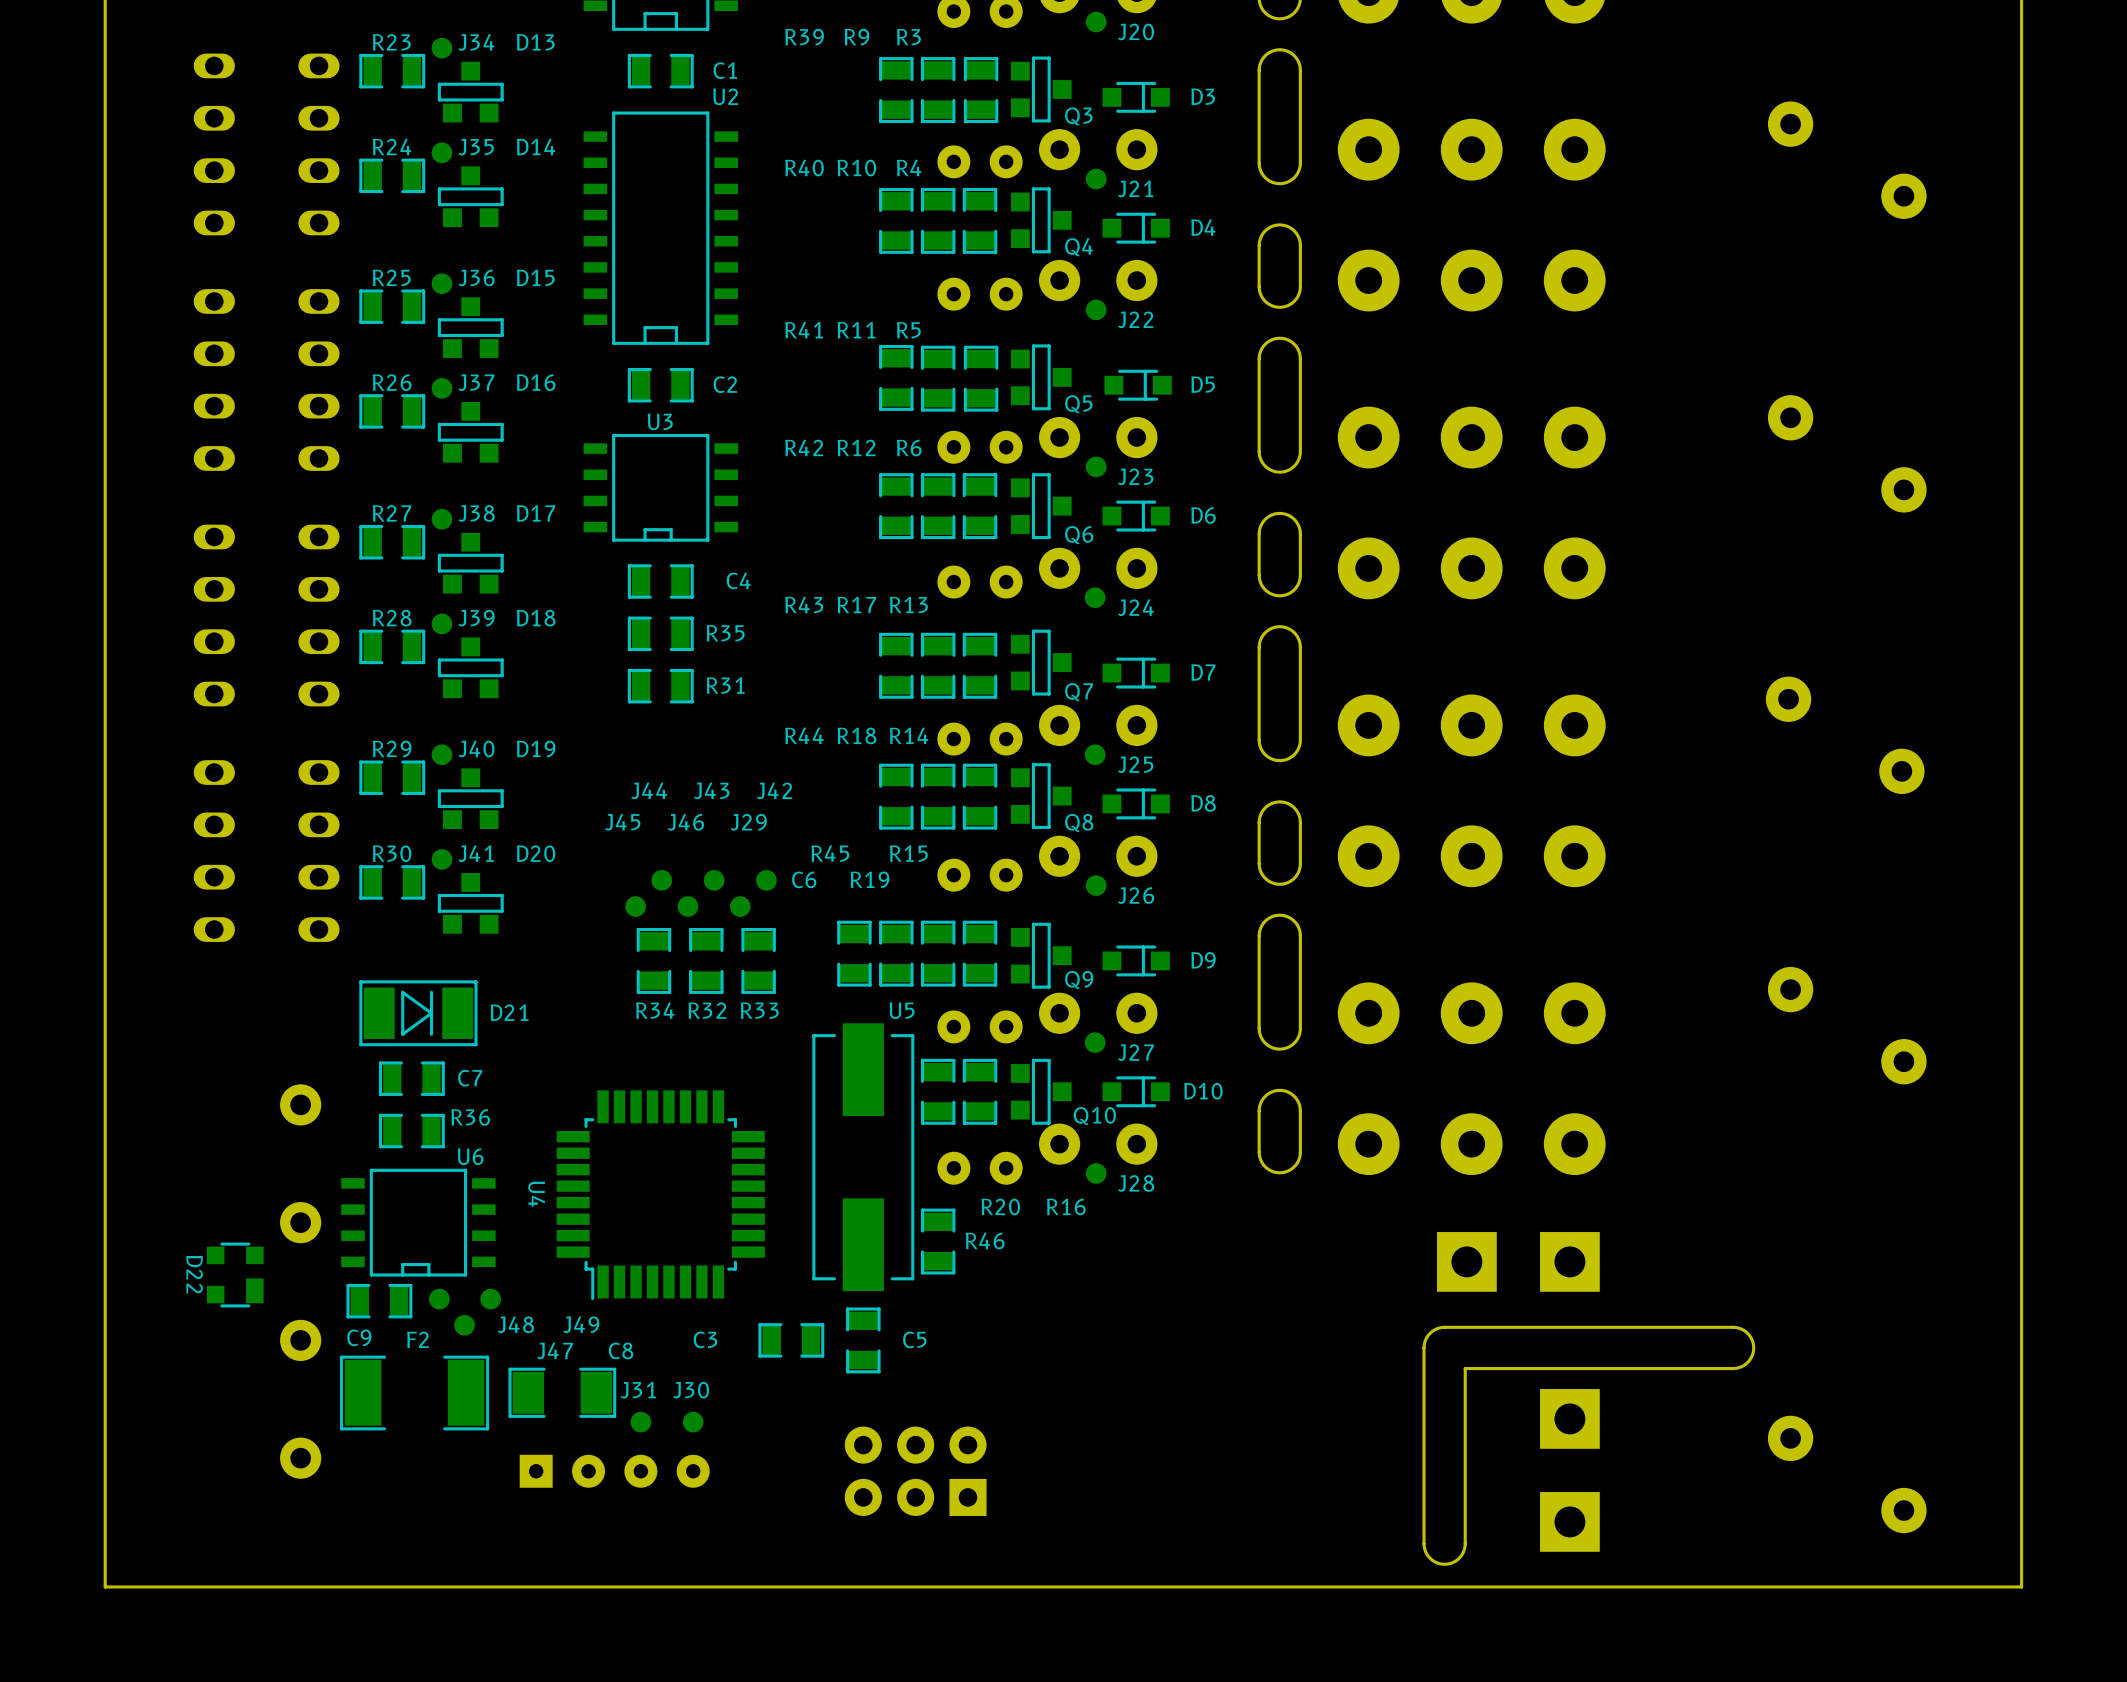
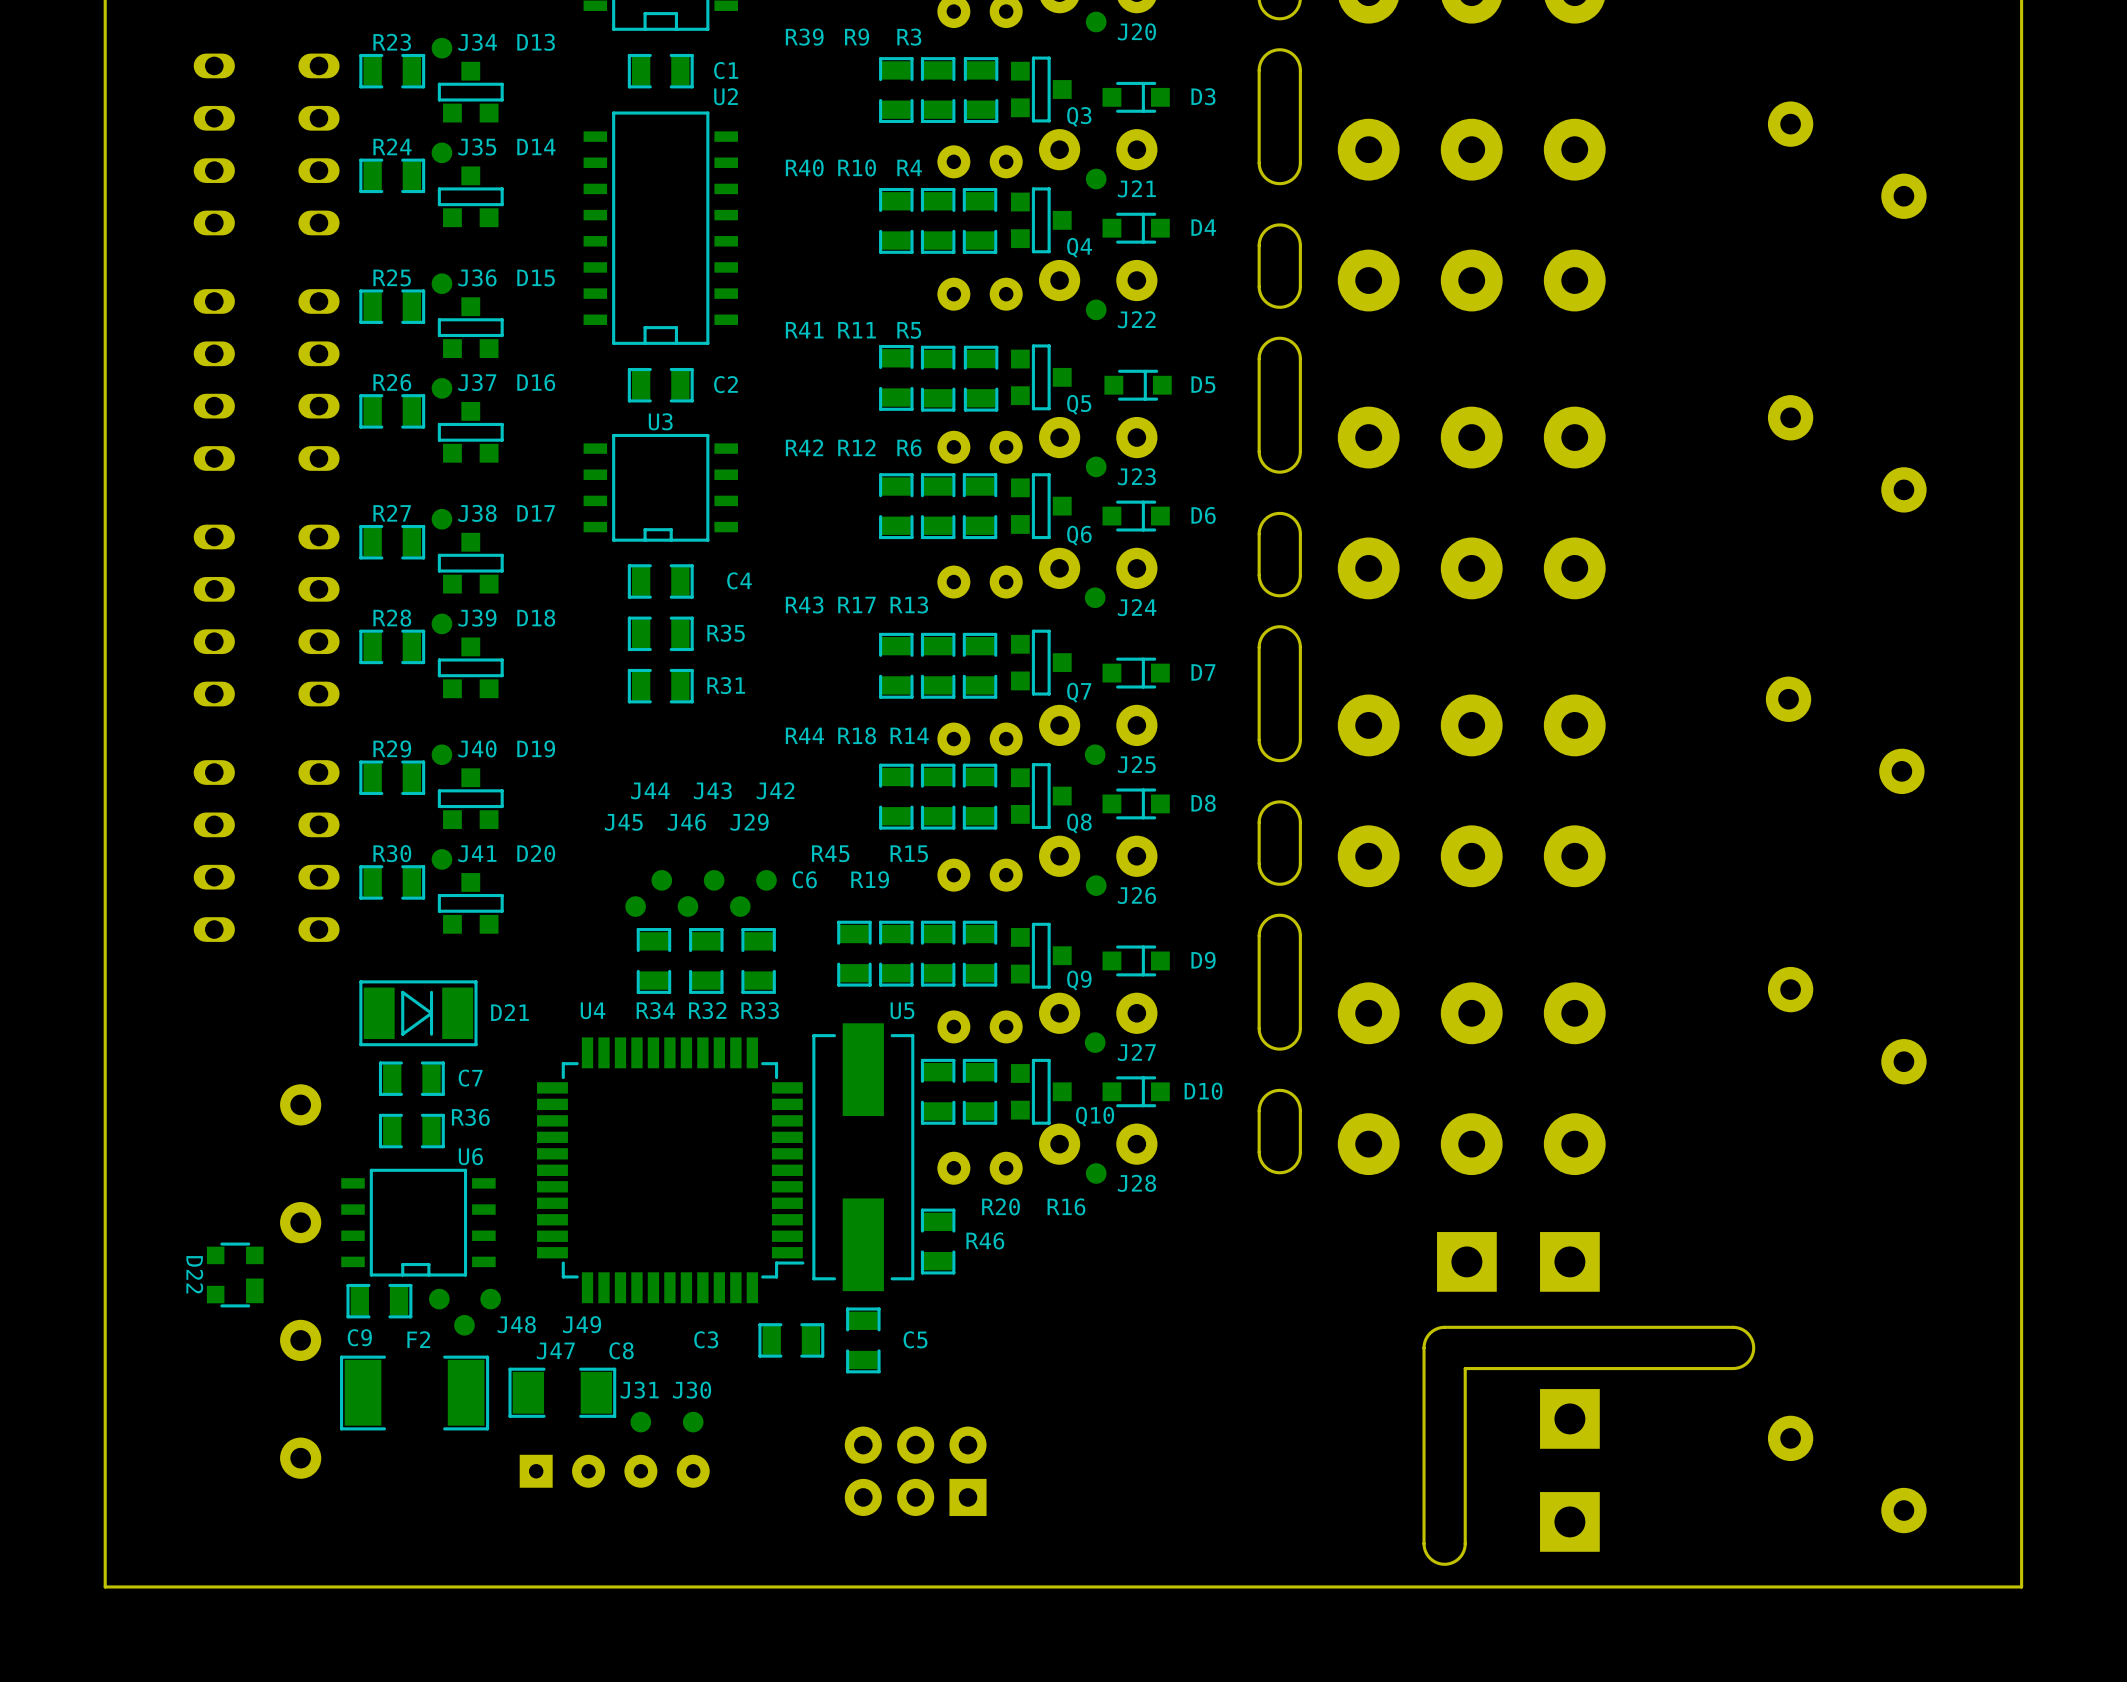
U4 footprint: [556, 1090, 765, 1301] -> [537, 1037, 805, 1304]
U4 name position: U4 (536, 1194) -> U4 (592, 1010)

